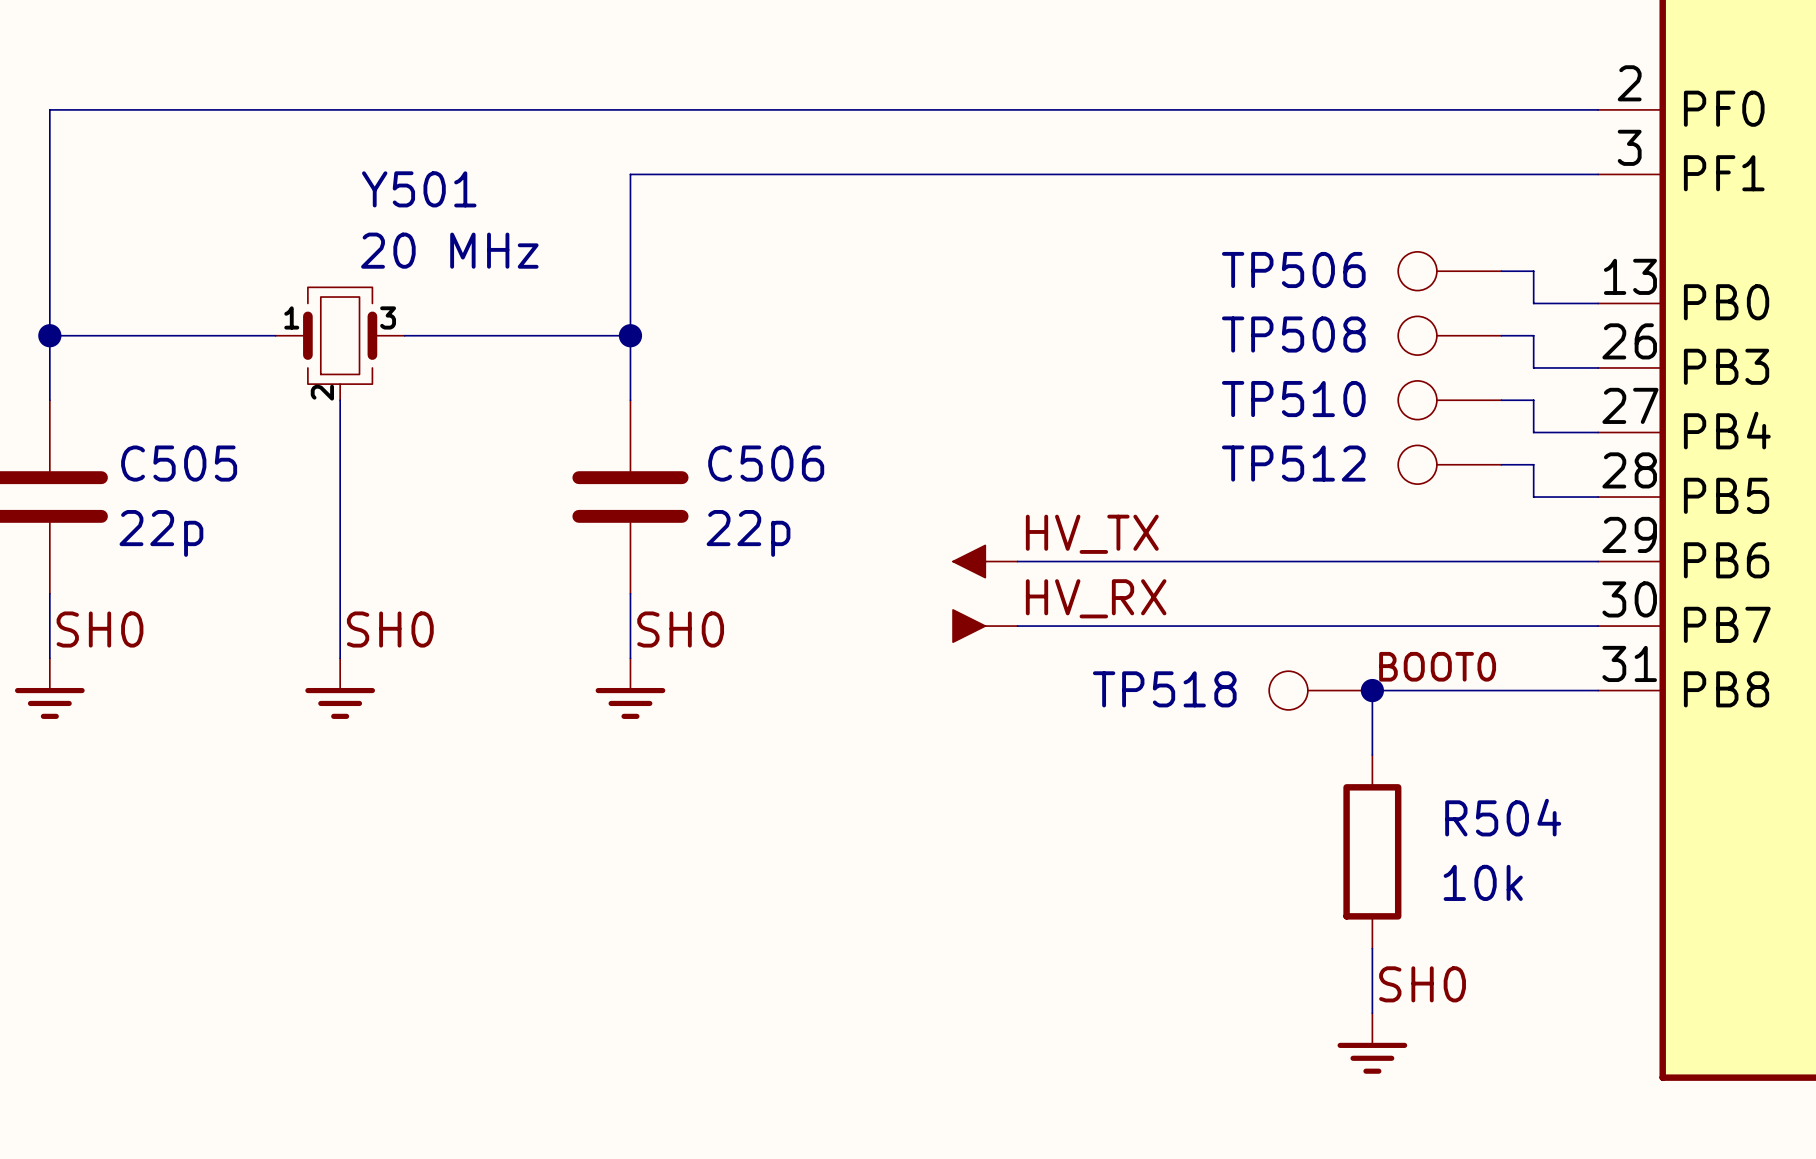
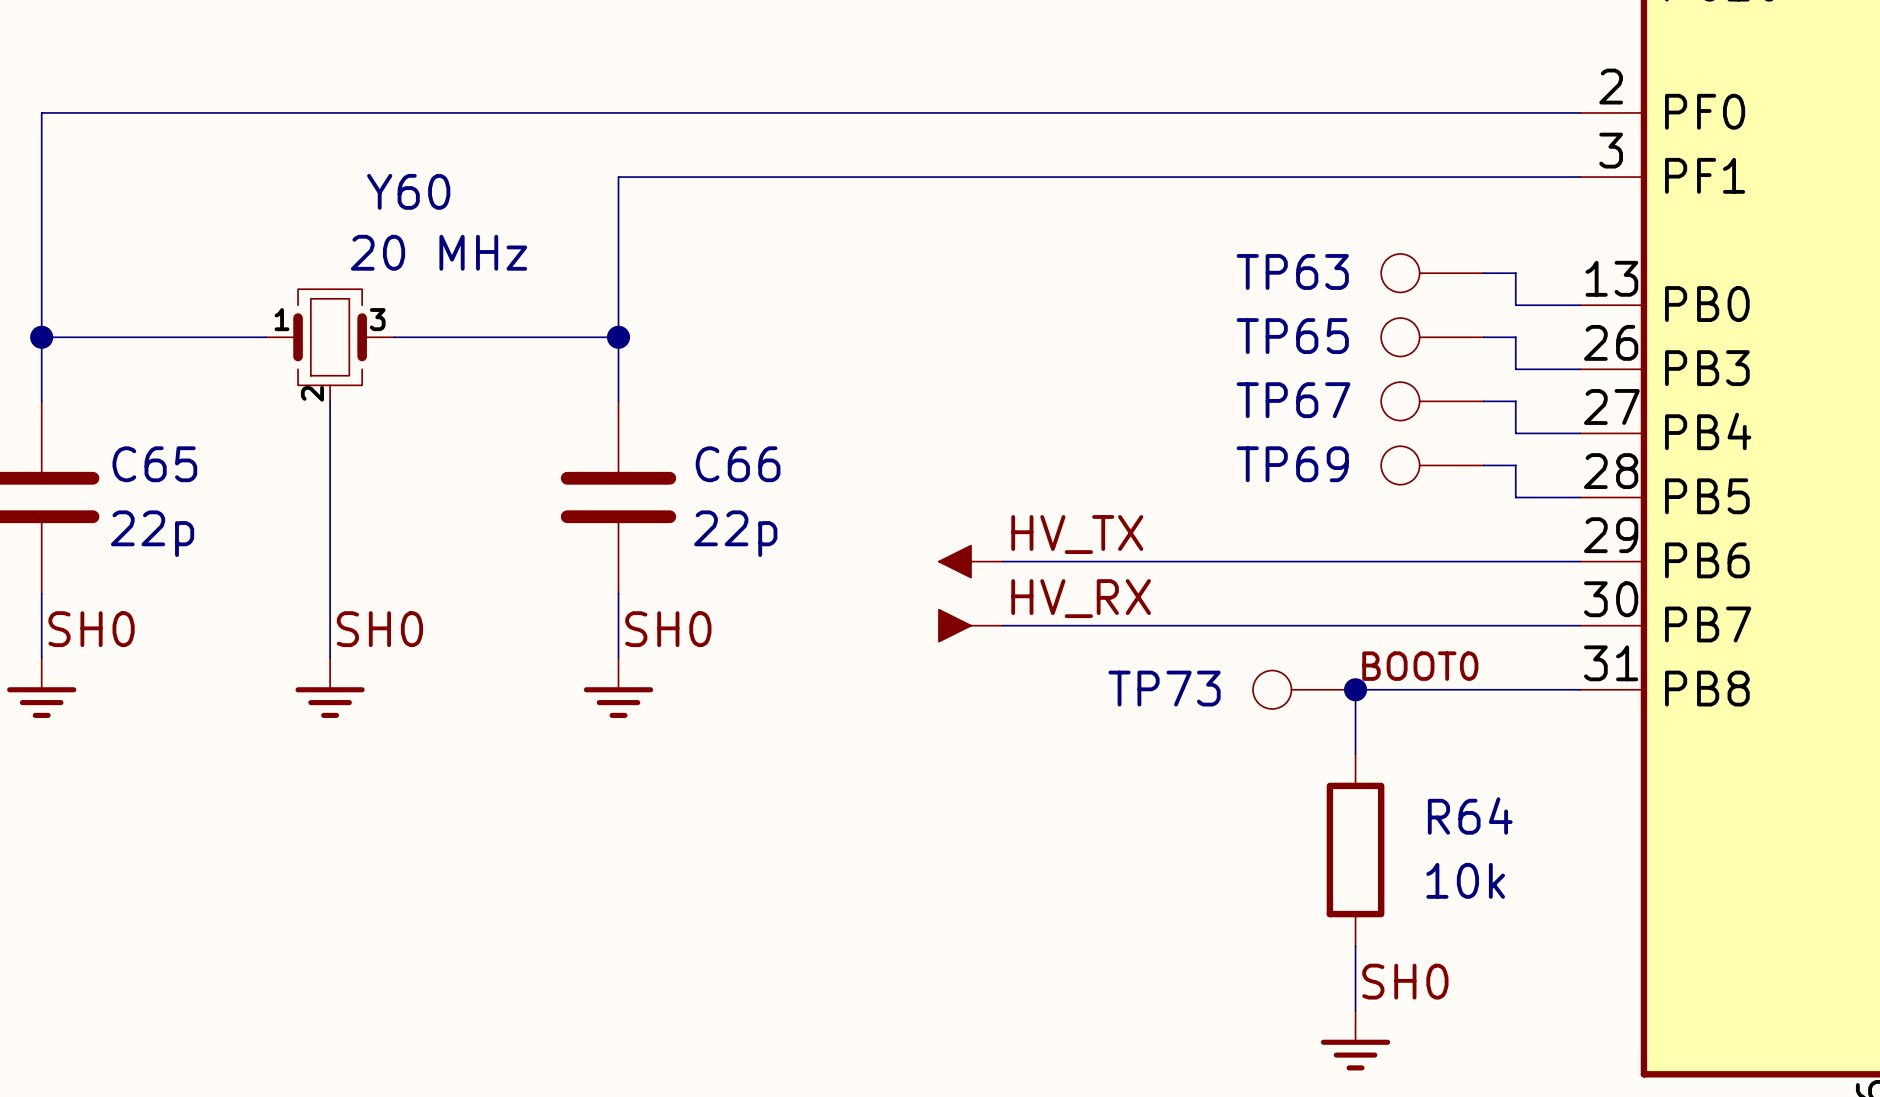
Y501 name: Y501 (419, 189) -> Y60 (408, 191)
TP506 name: TP506 (1293, 270) -> TP63 (1292, 271)
TP508 name: TP508 (1293, 334) -> TP65 (1292, 336)
TP510 name: TP510 (1293, 399) -> TP67 (1293, 400)
C505 name: C505 (179, 463) -> C65 (154, 464)
C506 name: C506 (766, 463) -> C66 (738, 464)
TP512 name: TP512 (1293, 463) -> TP69 (1292, 464)
TP518 name: TP518 (1164, 689) -> TP73 (1164, 688)
R504 name: R504 (1503, 817) -> R64 (1470, 815)

